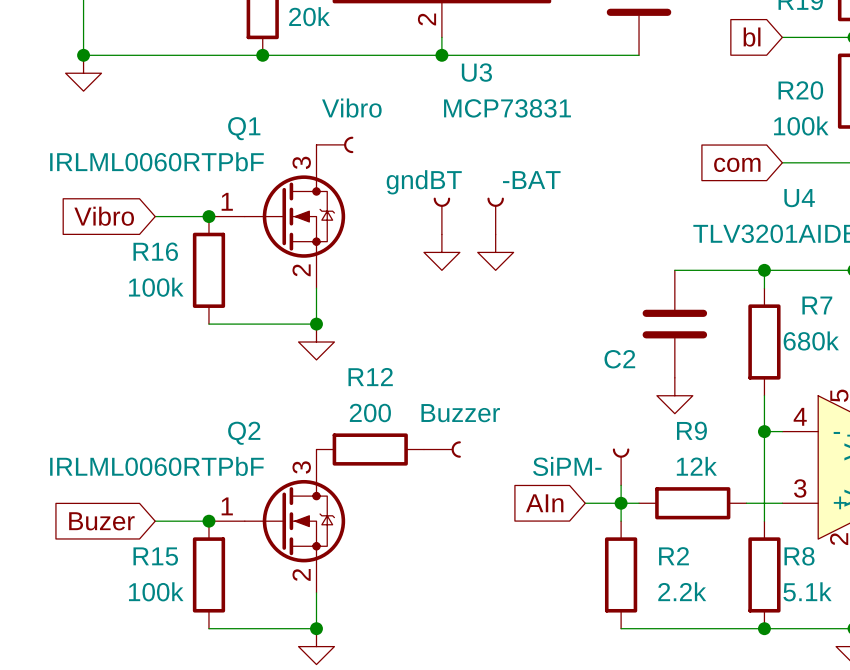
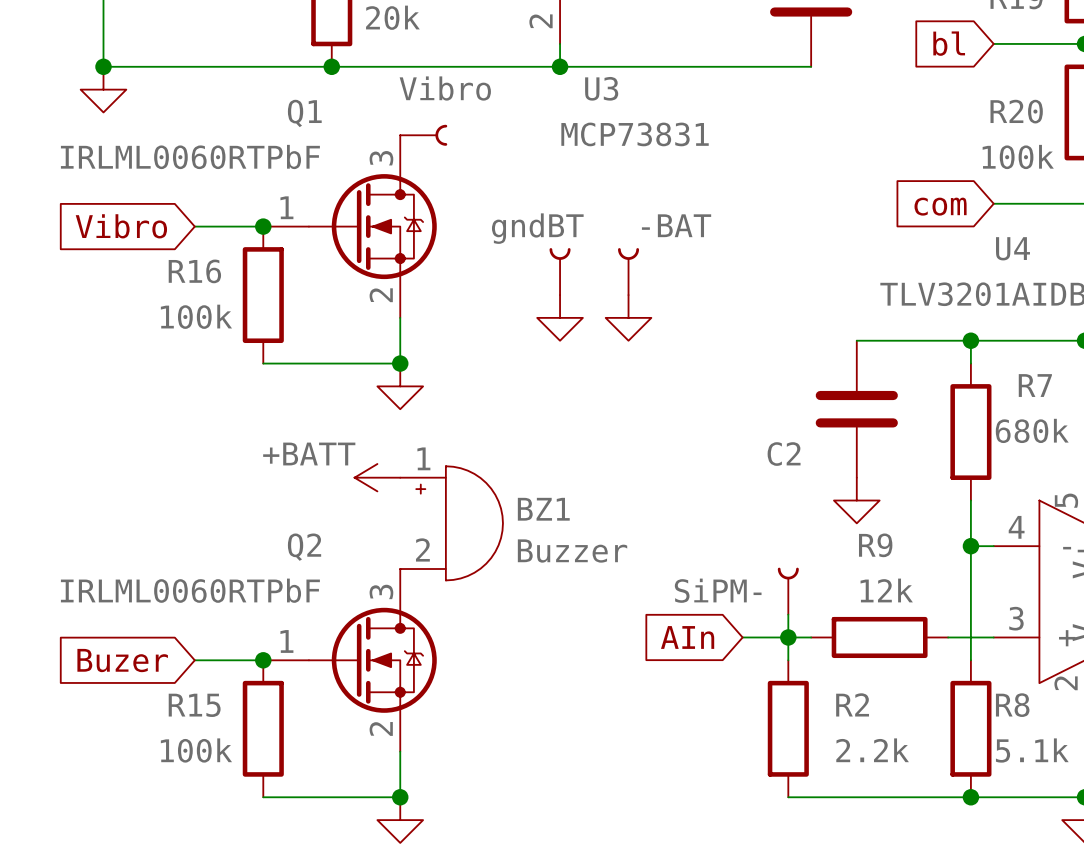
part position: (334, 144) -> (423, 135)
global label position: Vibro (104, 216) -> Vibro (121, 226)
wire: (155, 216) (208, 216) -> (194, 226) (263, 226)
junction position: (208, 216) -> (263, 226)
Q1 position: (277, 216) -> (350, 226)
R16 position: (208, 270) -> (263, 295)
wire: (316, 288) (316, 324) (208, 324) -> (400, 317) (400, 363) (263, 363)
junction position: (316, 324) -> (400, 363)
power symbol position: (316, 342) -> (400, 386)
power symbol: none -> +BATT (377, 477)
BZ1: none -> Buzzer (451, 523)
R12: 200 (370, 449) -> none
part: Buzzer (442, 449) -> none

